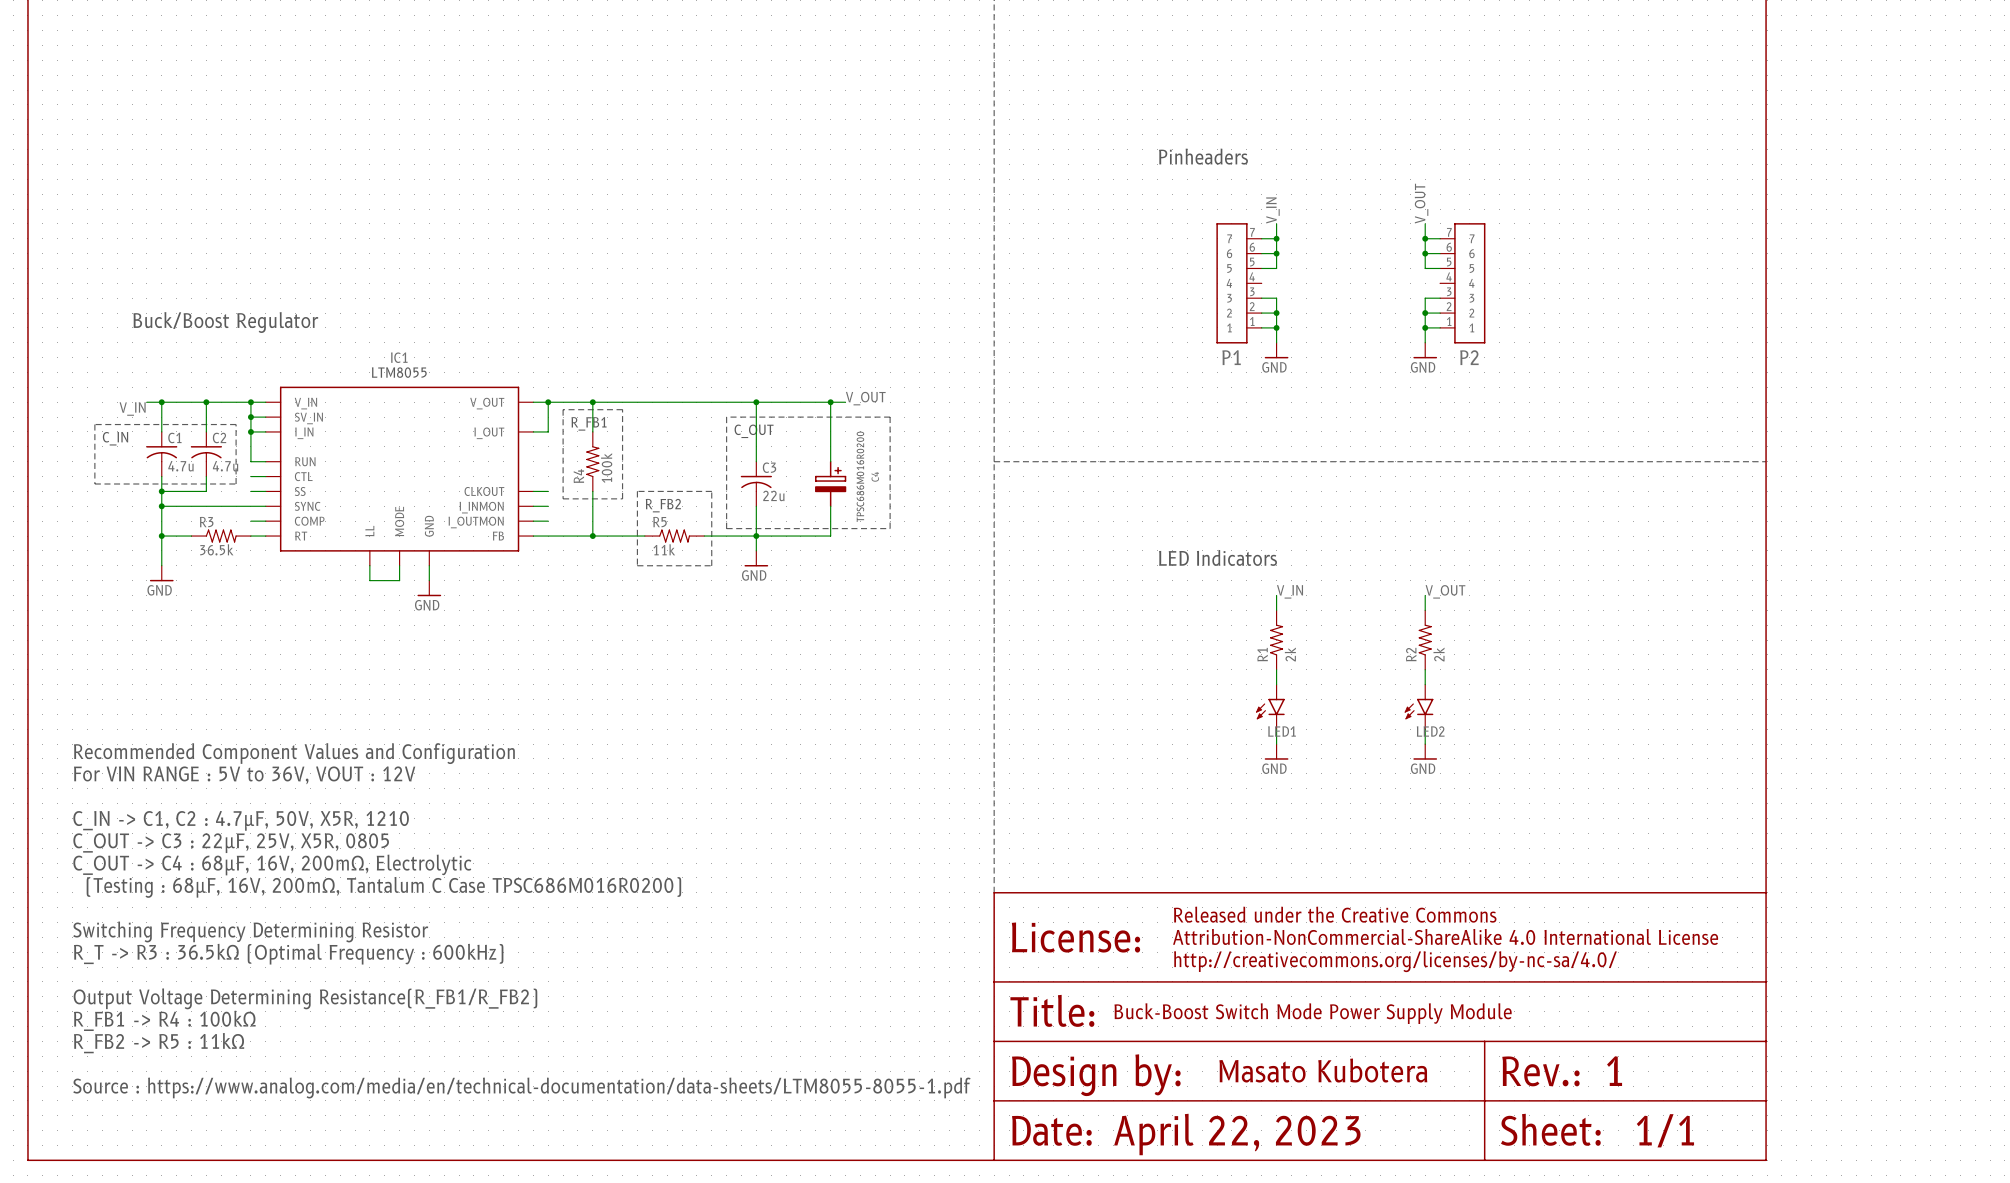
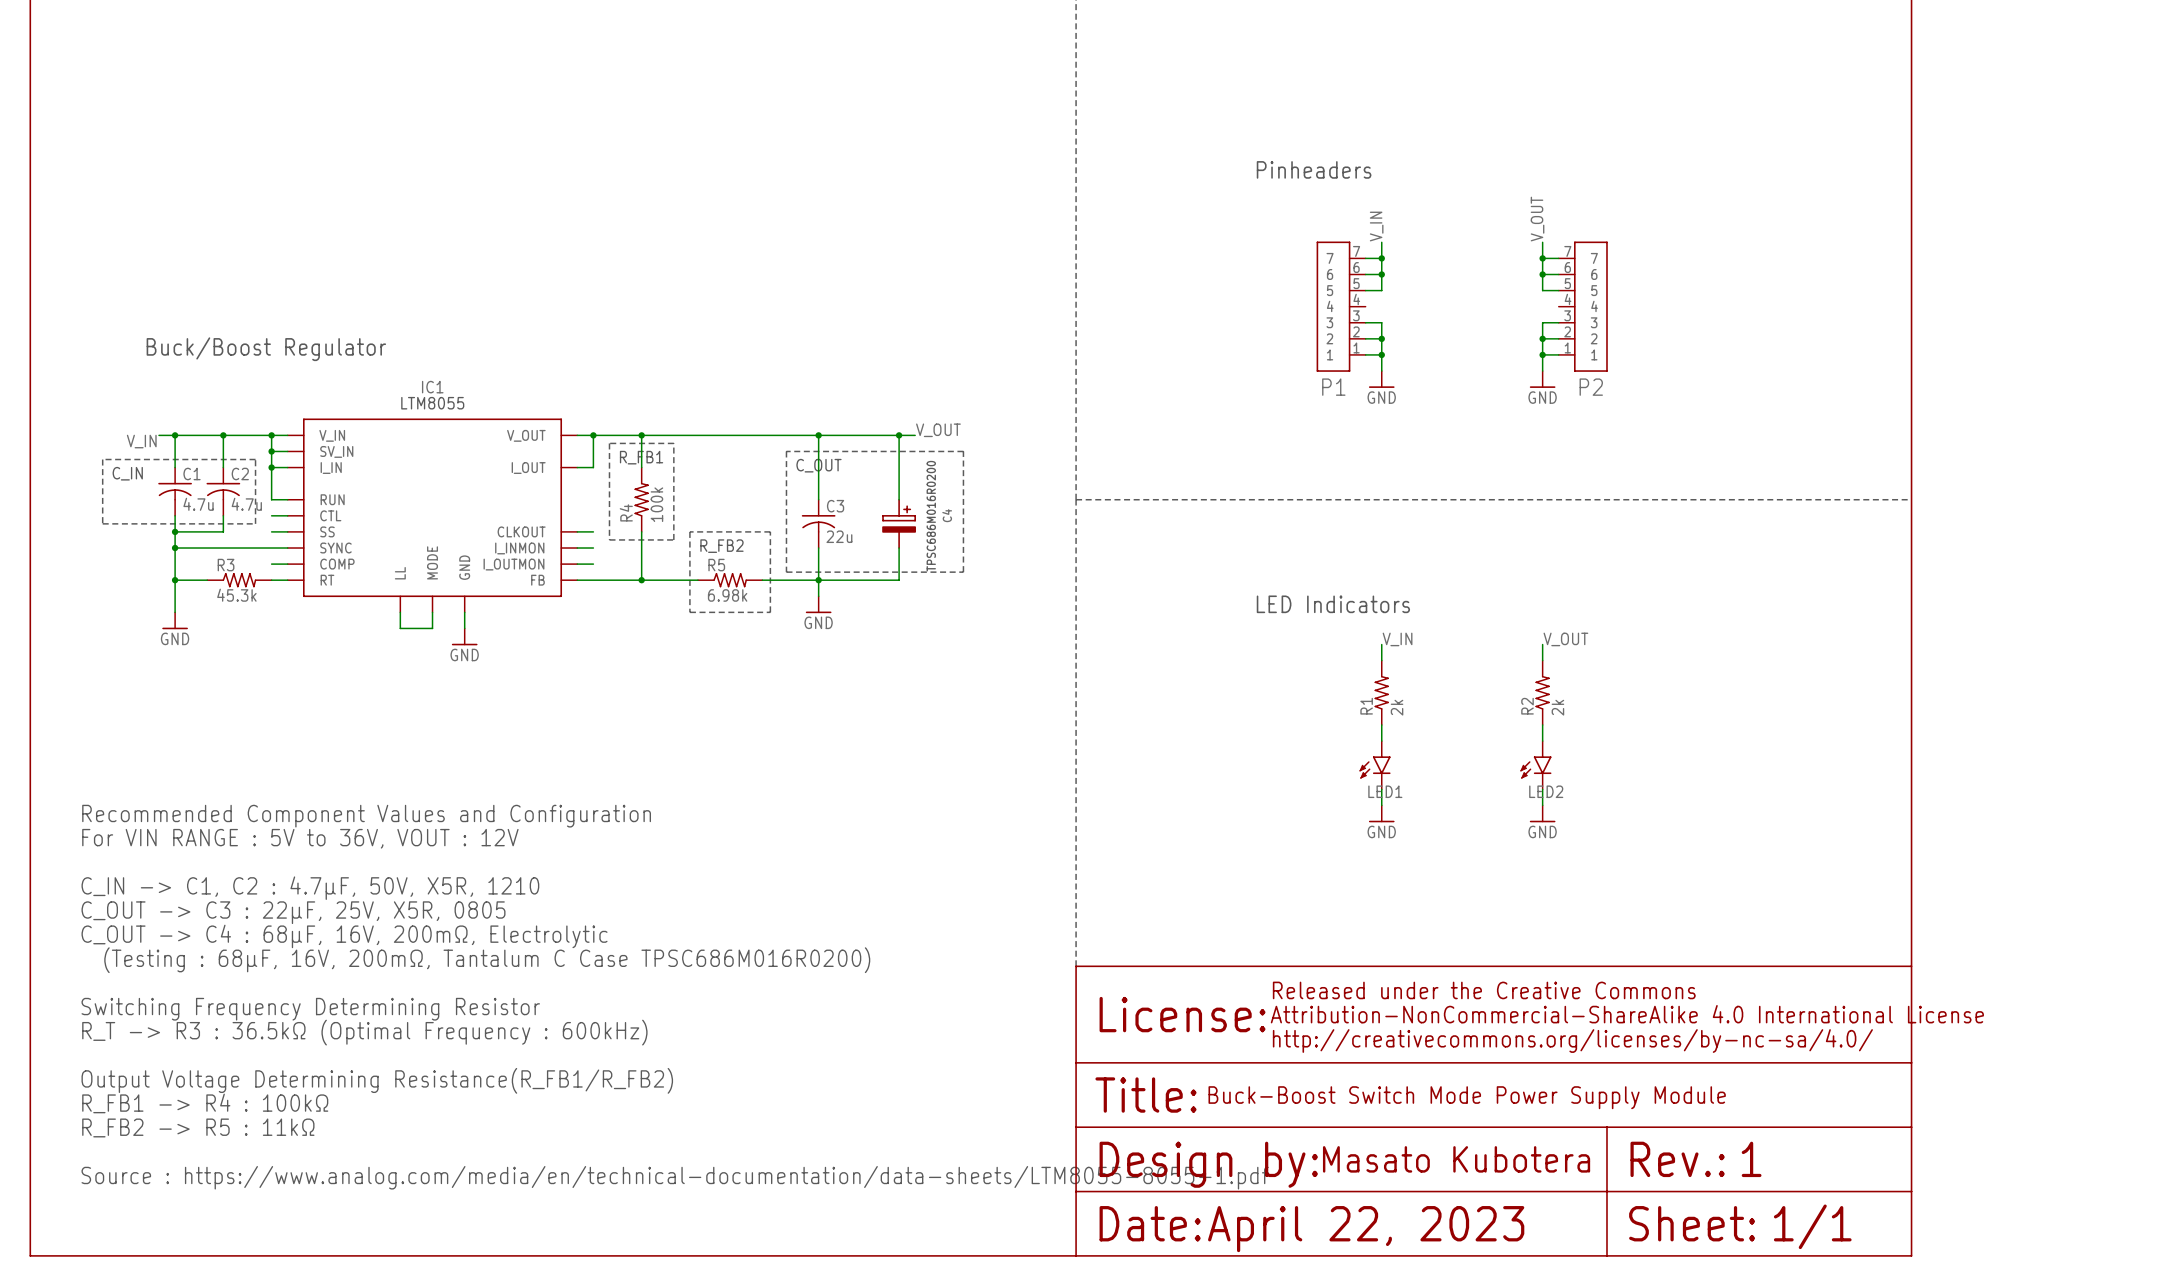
R3 value: 36.5k (216, 549) -> 45.3k (236, 595)
R5 value: 11k (664, 549) -> 6.98k (727, 595)

